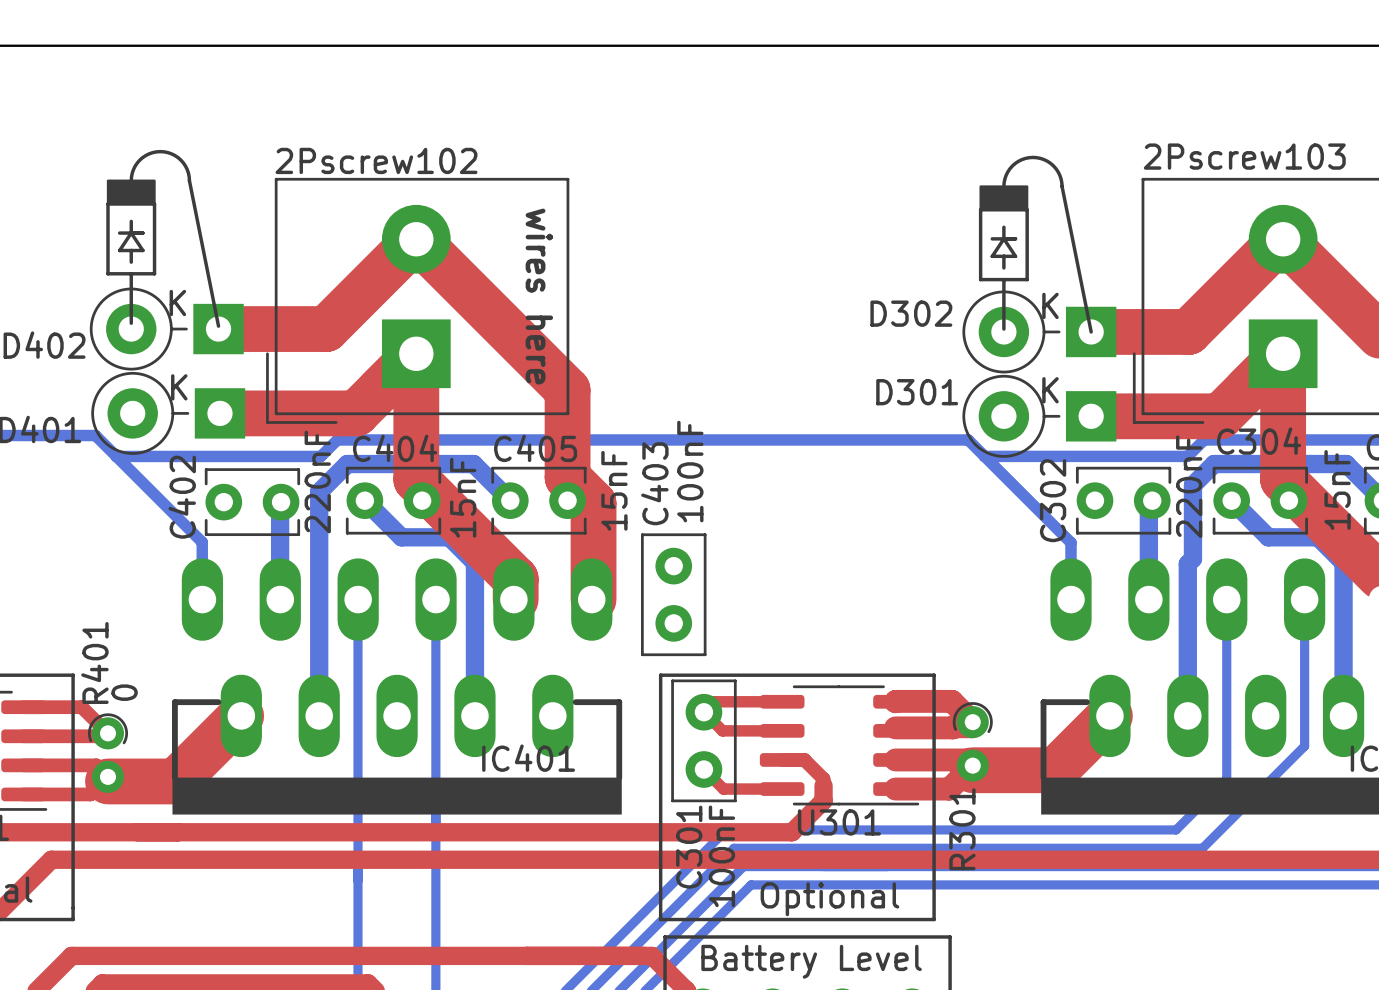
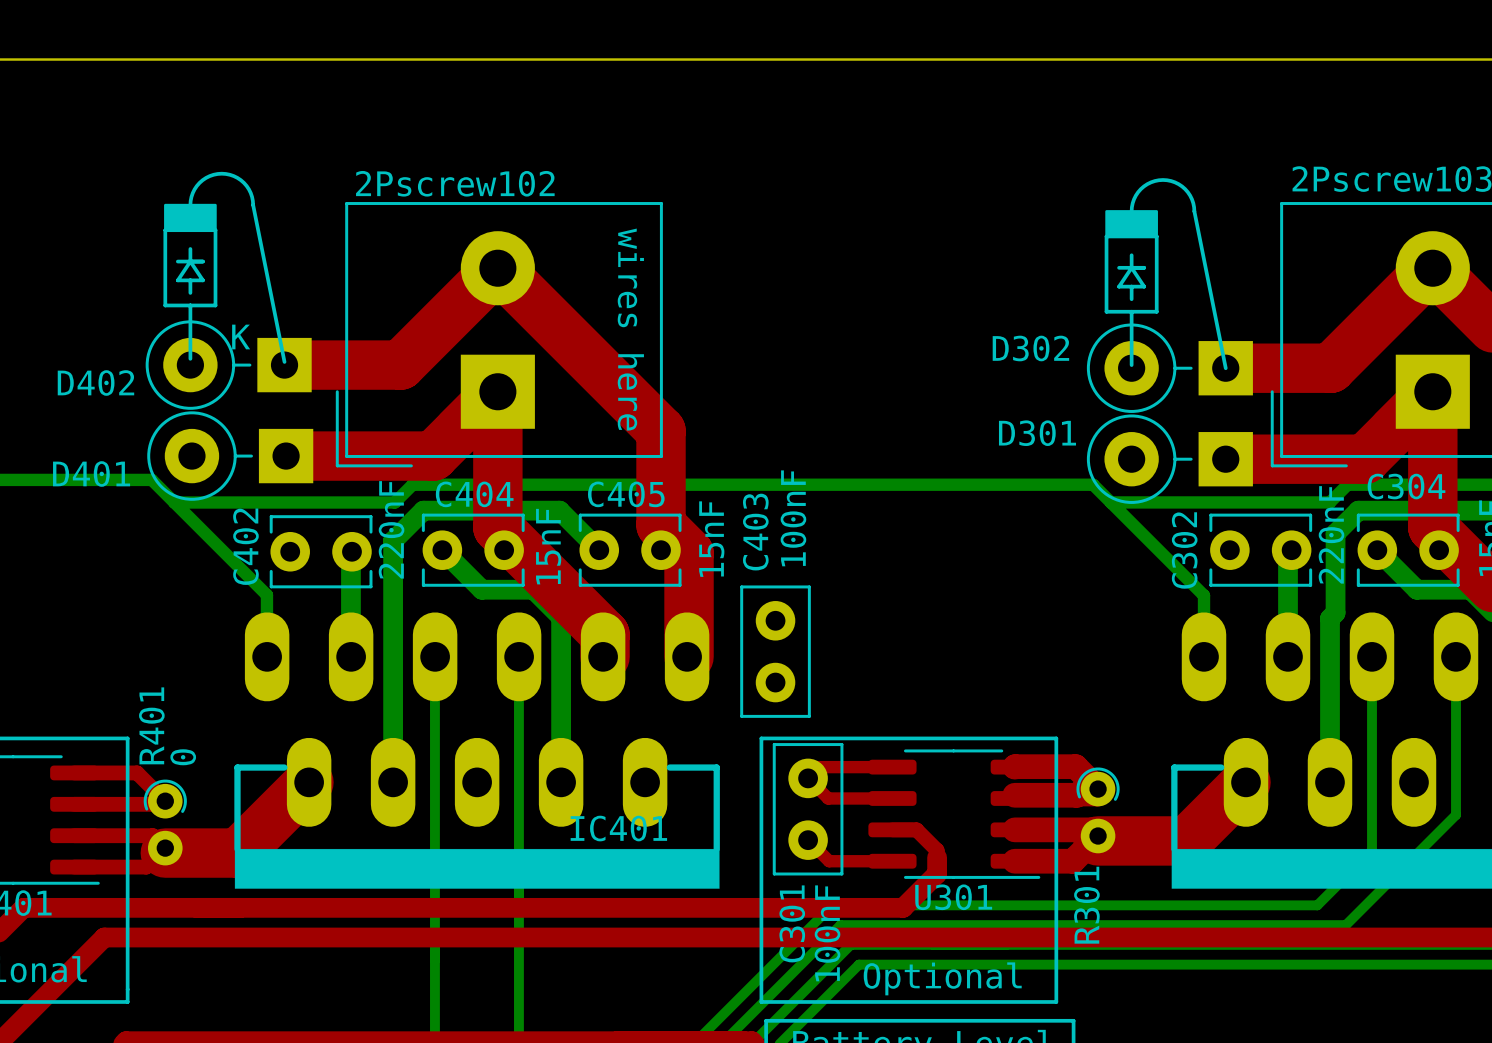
D302 text: K (1050, 305) -> none
D401 text: K (179, 387) -> none
D301 text: K (1050, 390) -> none

